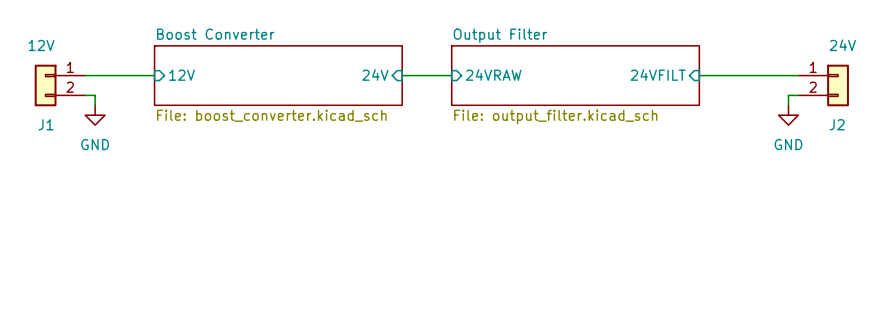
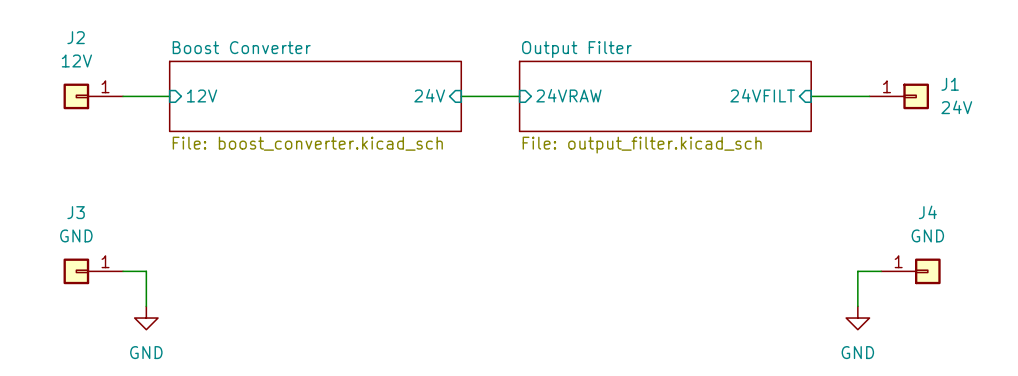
J1 value: 12V (41, 45) -> 24V (956, 107)
J2 value: 24V (842, 45) -> 12V (76, 60)
J1 symbol: [34, 64, 86, 107] -> [869, 83, 930, 110]
J2 symbol: [798, 64, 849, 107] -> [63, 83, 124, 110]
wire: (85, 95) (95, 95) (95, 105) -> none
wire: (798, 95) (788, 95) (788, 105) -> none
power symbol position: GND (95, 115) -> GND (146, 318)
power symbol position: GND (788, 115) -> GND (857, 318)
J1 name position: J1 (45, 124) -> J1 (950, 84)
J2 name position: J2 (837, 124) -> J2 (76, 37)
J3: none -> GND (93, 271)
wire: none -> (123, 271) (146, 271) (146, 306)
wire: none -> (881, 271) (857, 271) (857, 306)
J4: none -> GND (910, 271)

